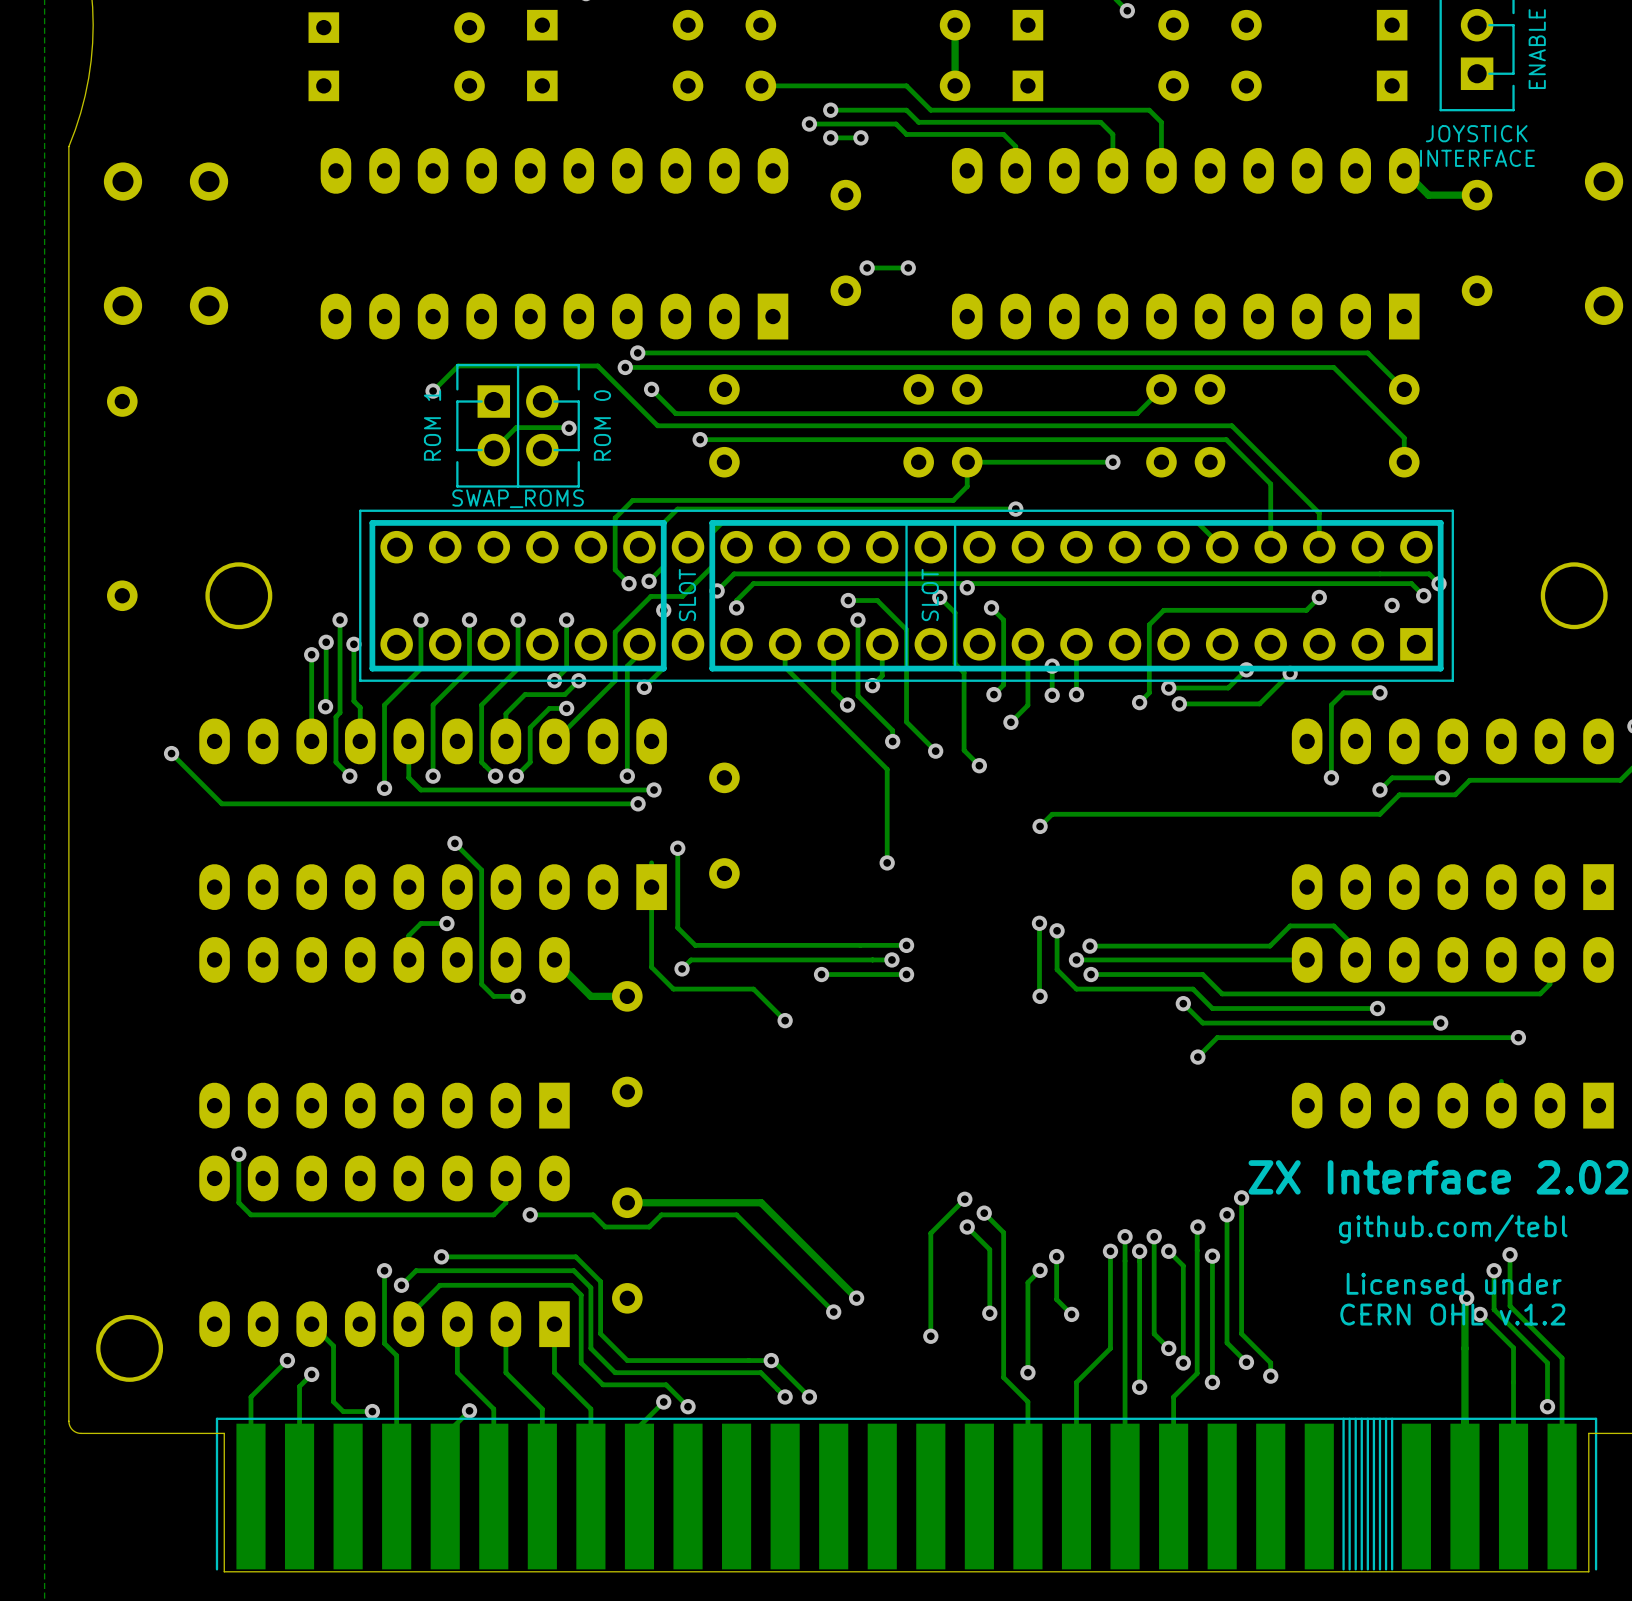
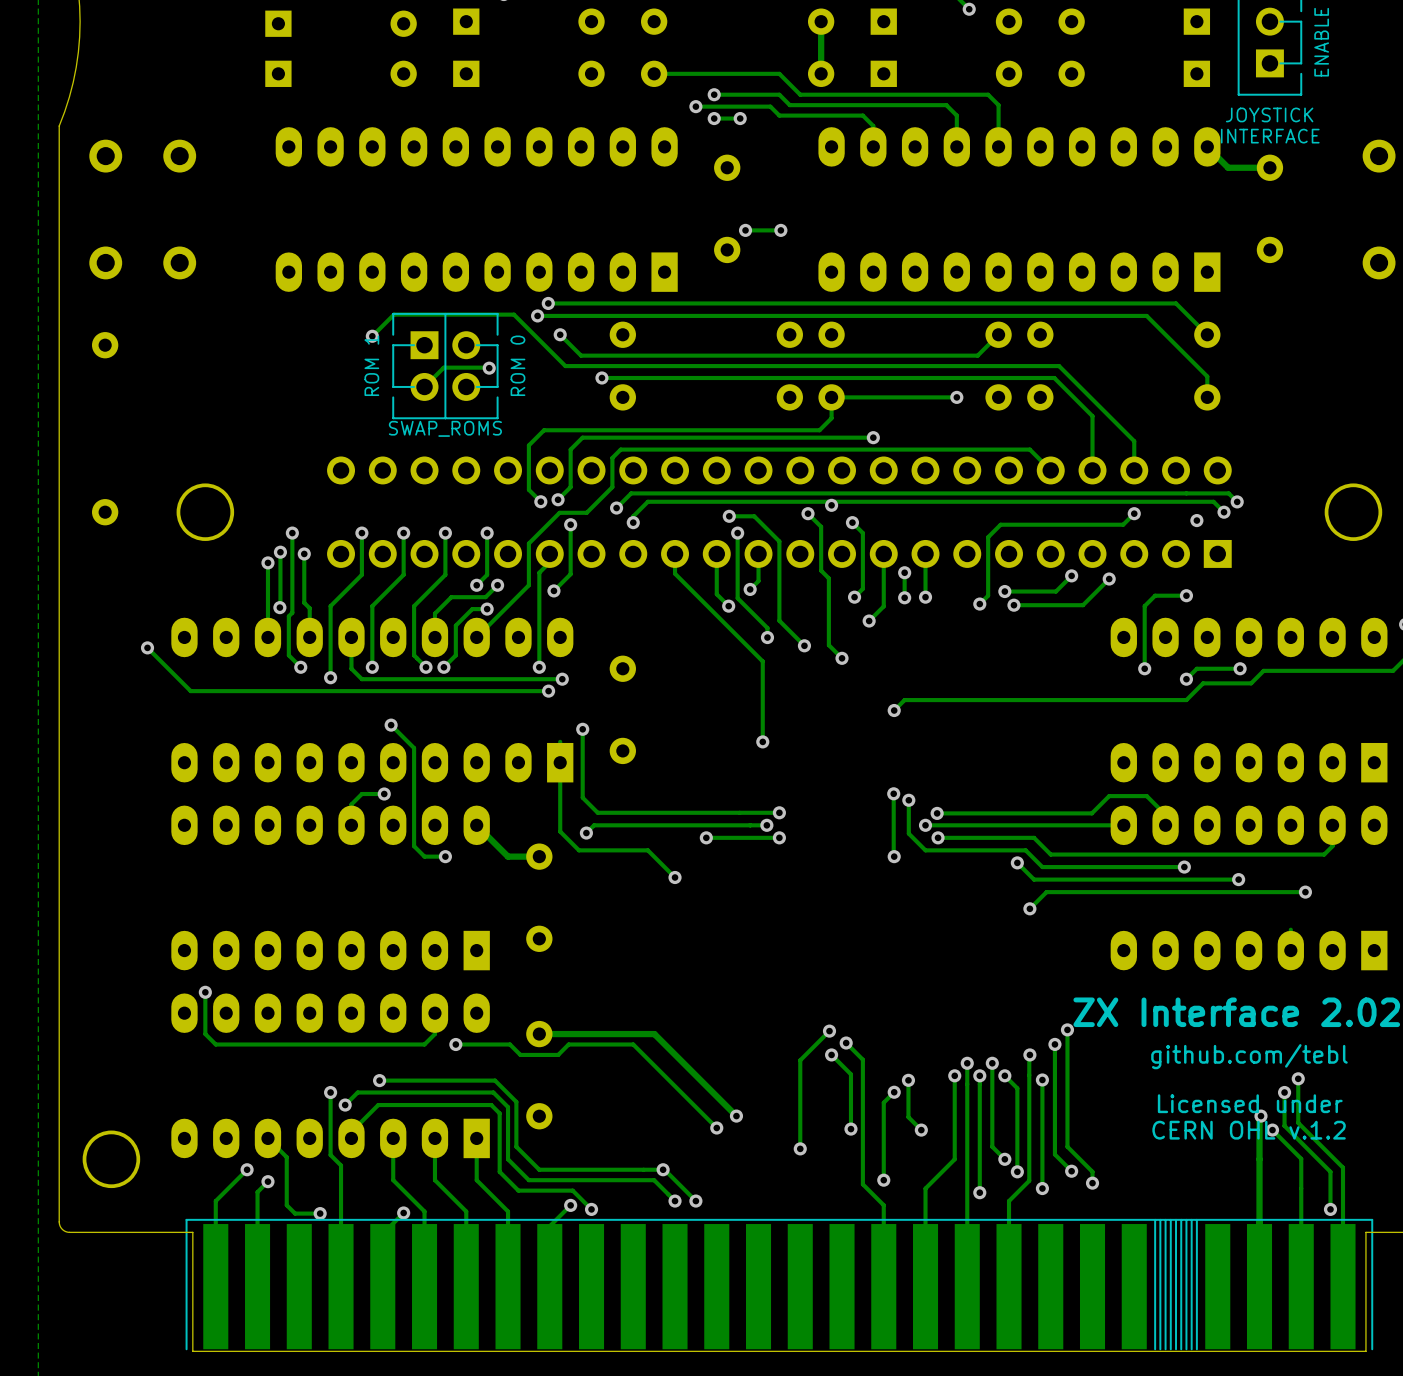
line: (1452, 510) (360, 510) (360, 680) (1452, 680) (1452, 510) -> none
line: (663, 522) (663, 668) (372, 668) (372, 522) (663, 522) -> none
line: (906, 522) (906, 668) -> none
line: (955, 522) (955, 668) -> none
line: (1440, 522) (712, 522) (712, 668) (1440, 668) (1440, 522) -> none
text: SLOT (687, 595) -> none
text: SLOT (930, 595) -> none

